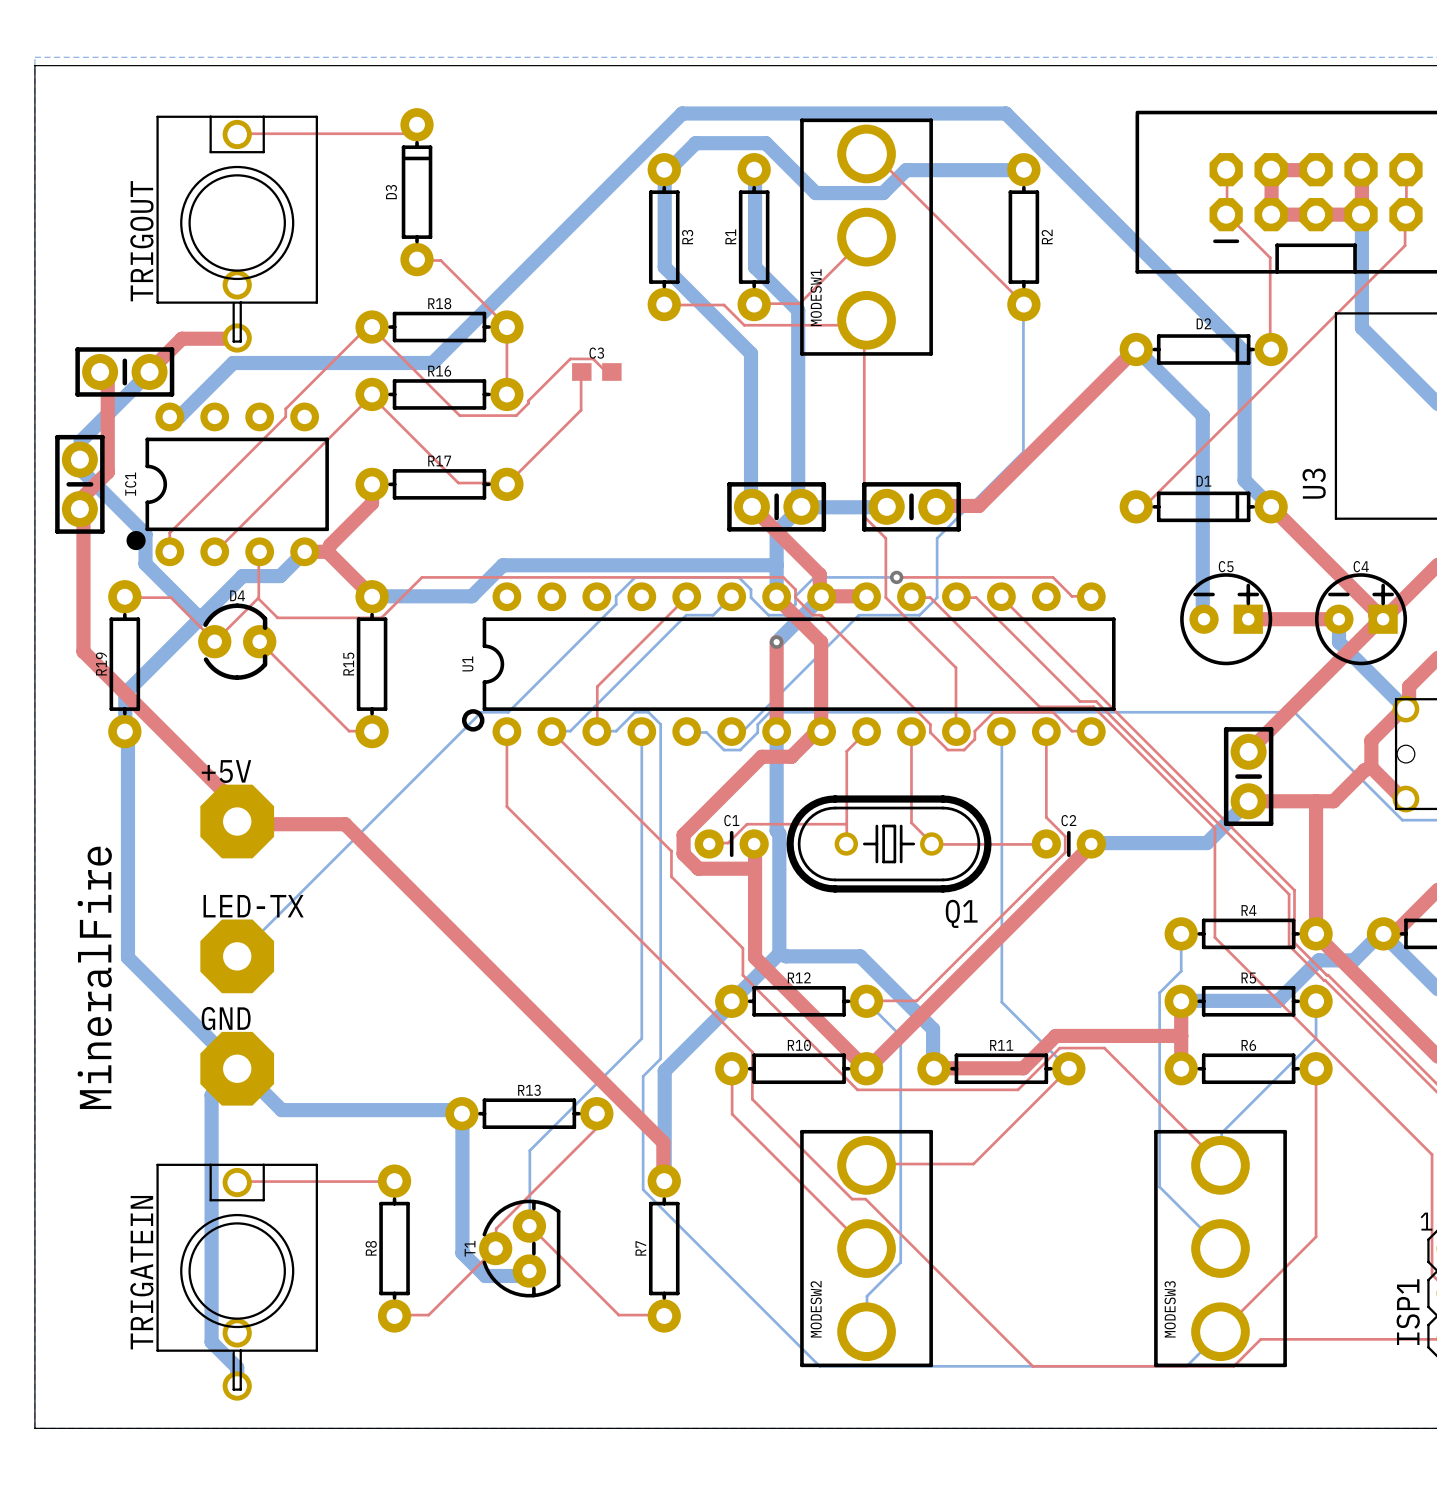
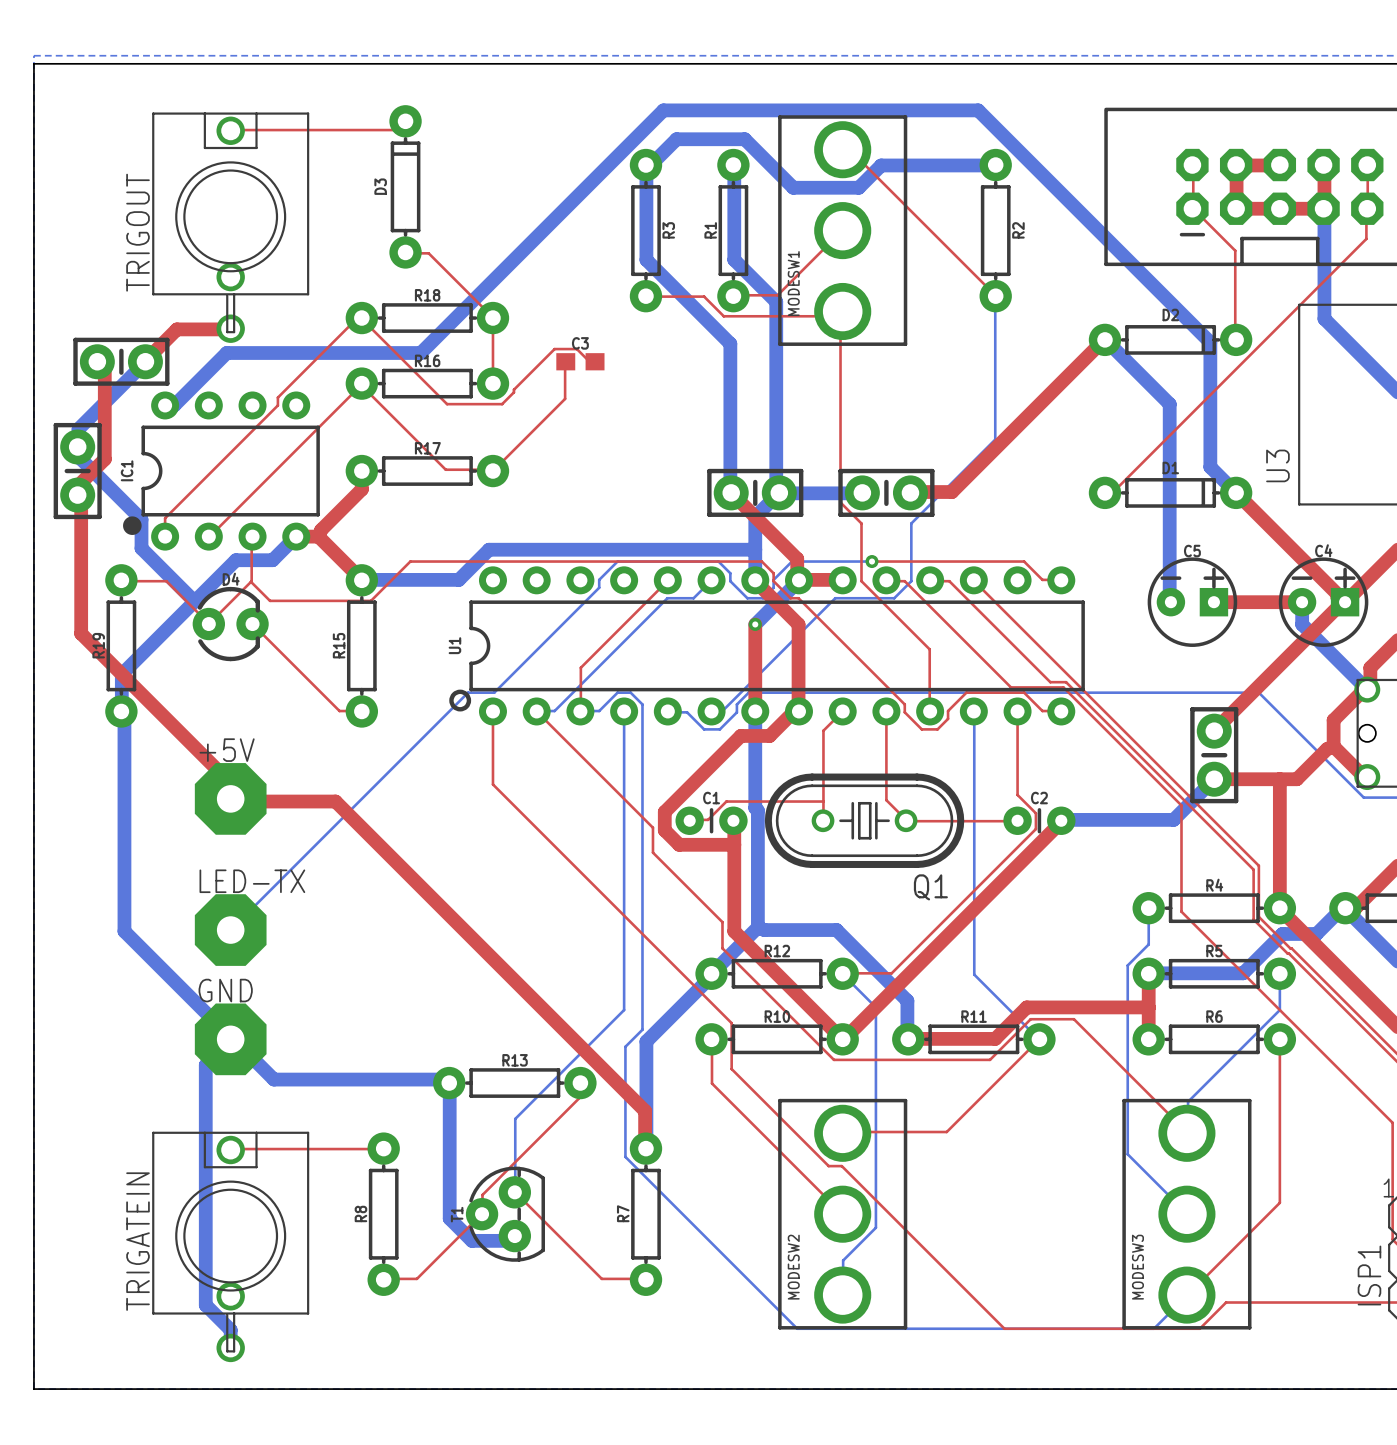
text: MineralFire (94, 977) -> none

